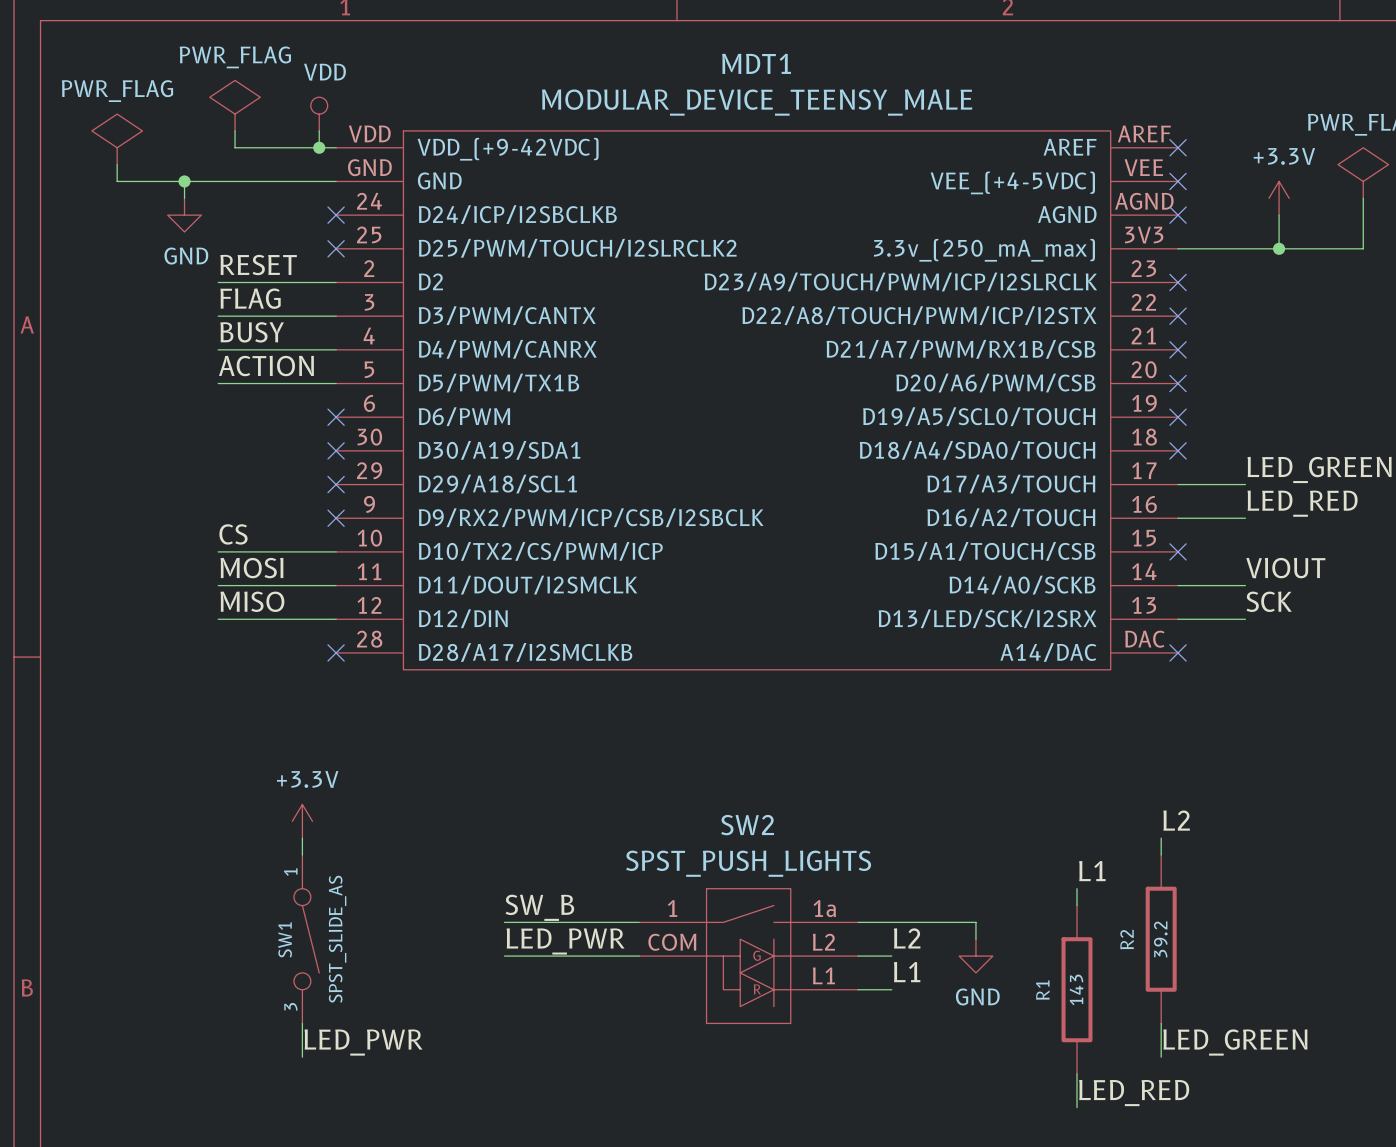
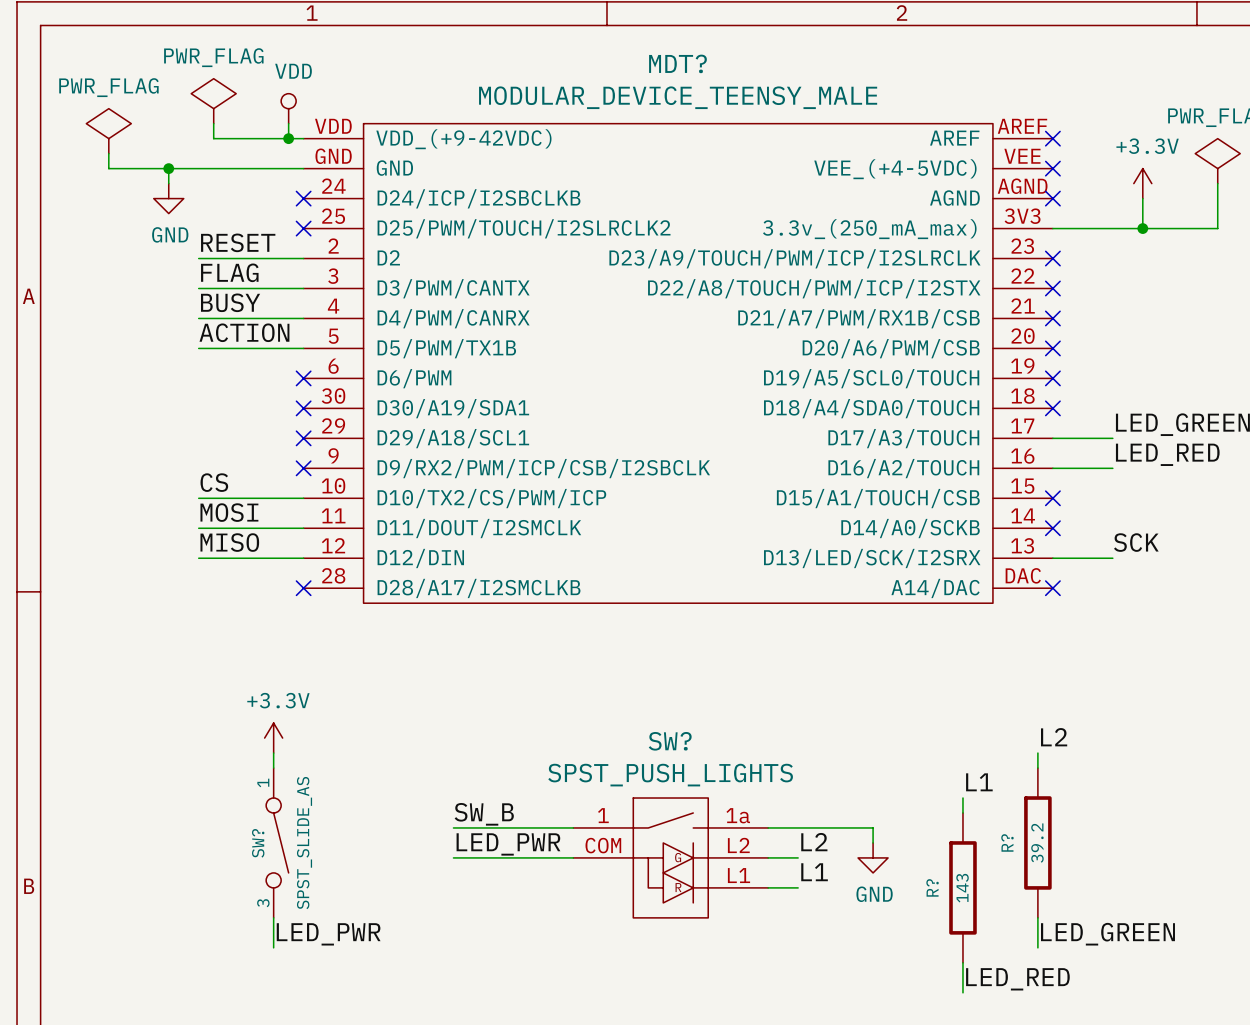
MDT1 name: MDT1 (756, 63) -> MDT? (677, 63)
label: VIOUT (1285, 568) -> none
wire: (1178, 585) (1245, 585) -> none
no-connect mark: none -> (1052, 528)
SW2 name: SW2 (747, 825) -> SW? (670, 741)
SW1 name: SW1 (285, 939) -> SW? (258, 843)
R2 name: R2 (1127, 939) -> R? (1007, 842)
R1 name: R1 (1042, 990) -> R? (932, 887)

